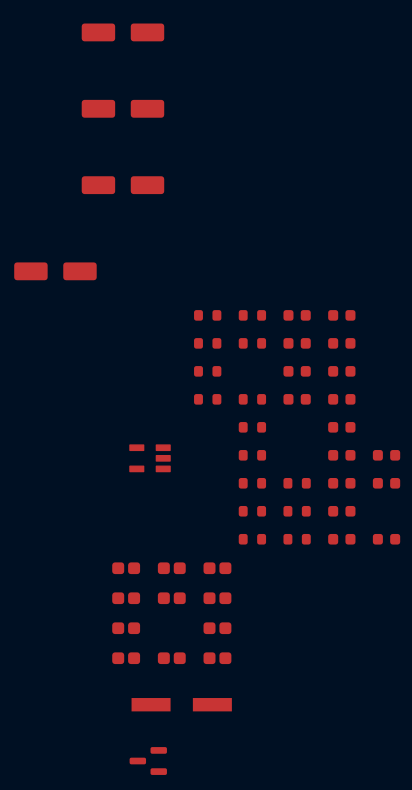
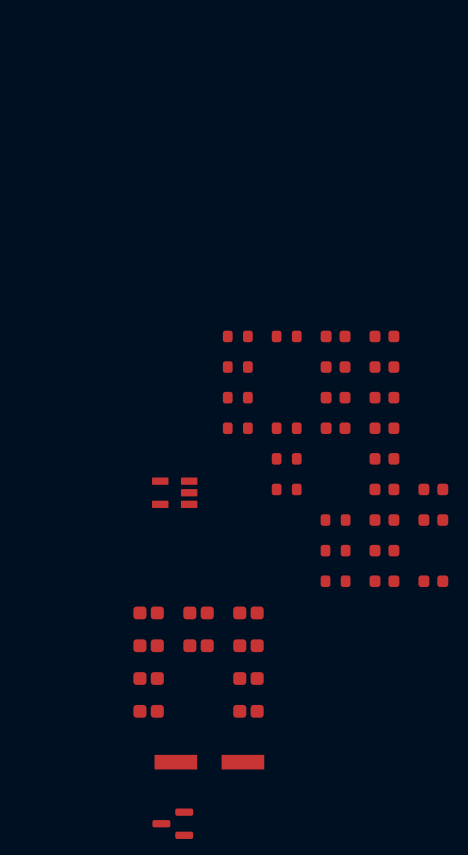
part: (122, 32) -> none
part: (122, 108) -> none
part: (122, 185) -> none
part: (55, 271) -> none
part: (252, 343) -> none
part: (252, 483) -> none
part: (252, 511) -> none
part: (252, 539) -> none
part: (171, 658) -> none

